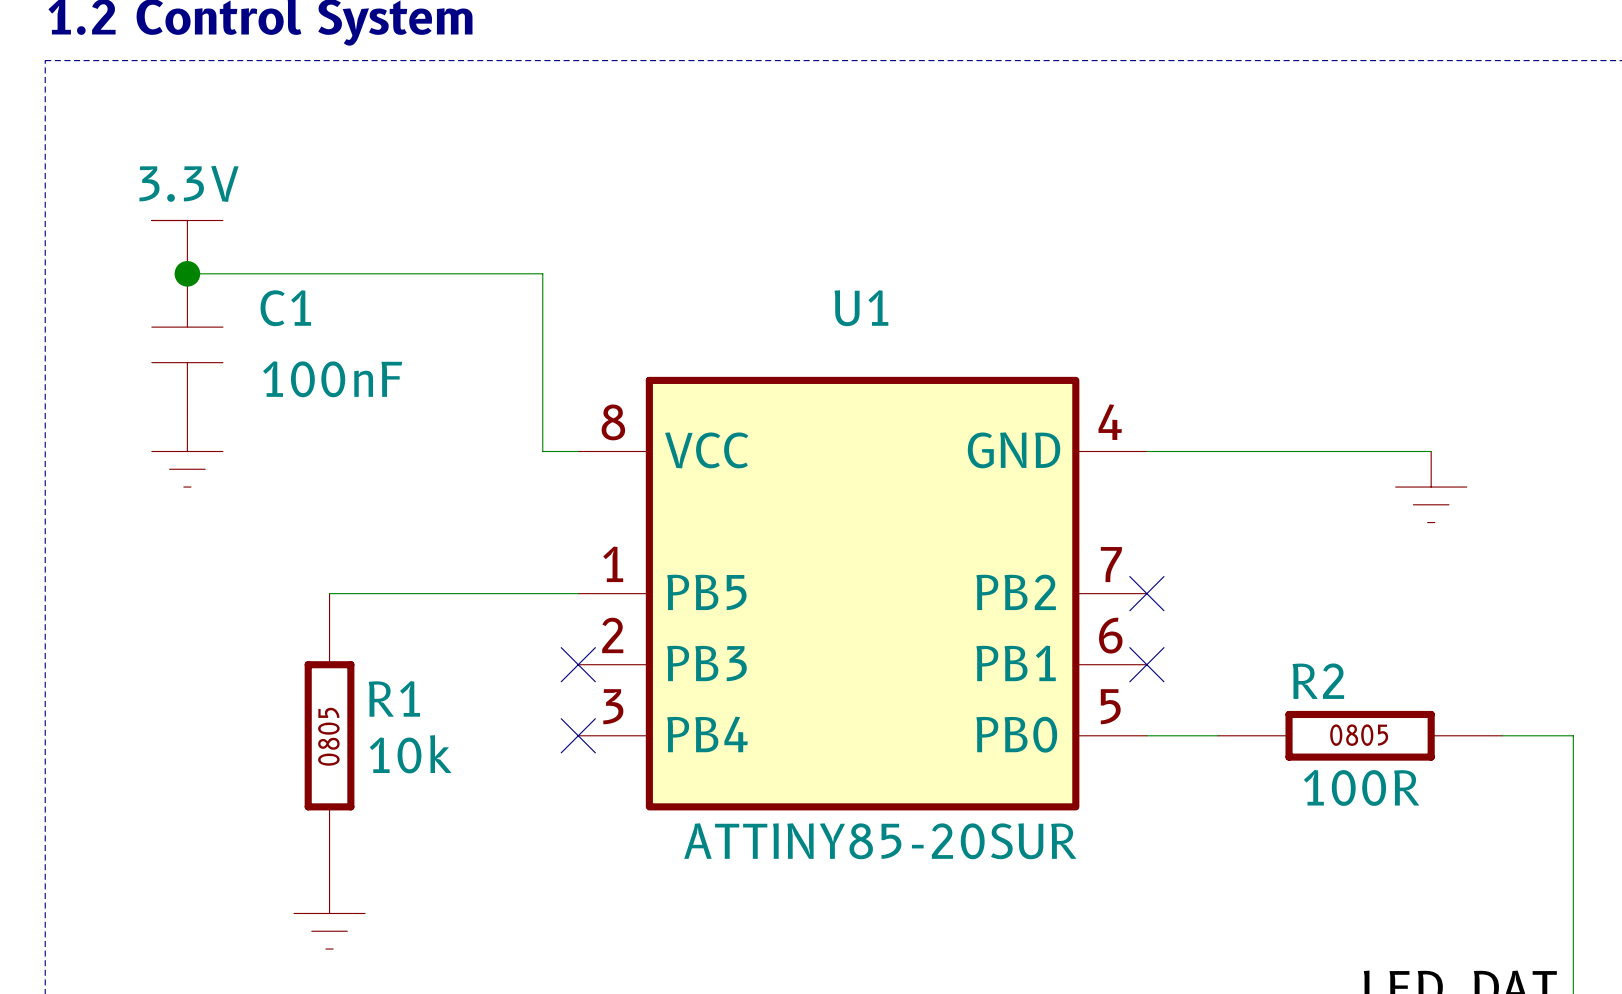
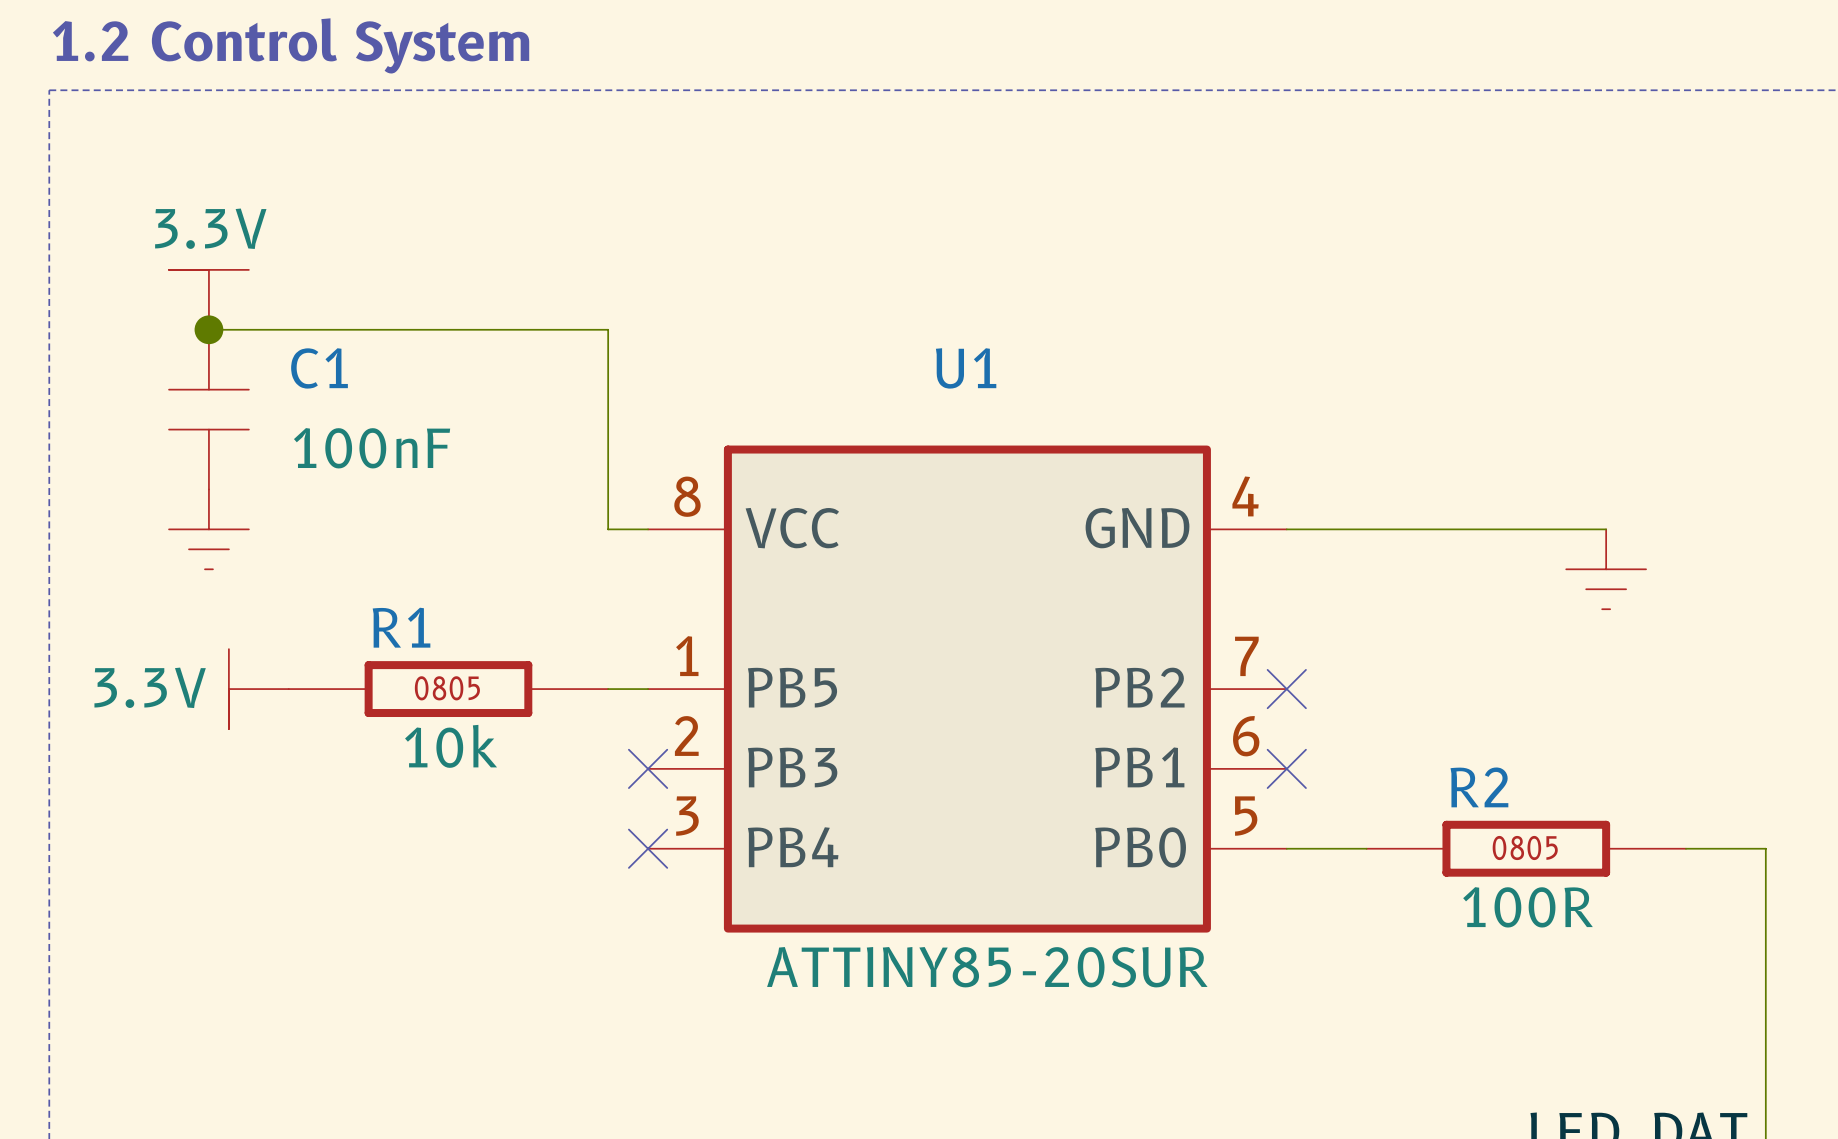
power symbol: none -> 3.3V (258, 689)
wire: (329, 593) (542, 593) -> none
R1 name position: R1 (394, 698) -> R1 (401, 627)
R1 rotation: 0° (329, 735) -> 90° clockwise (448, 689)
power symbol: (329, 913) -> none

